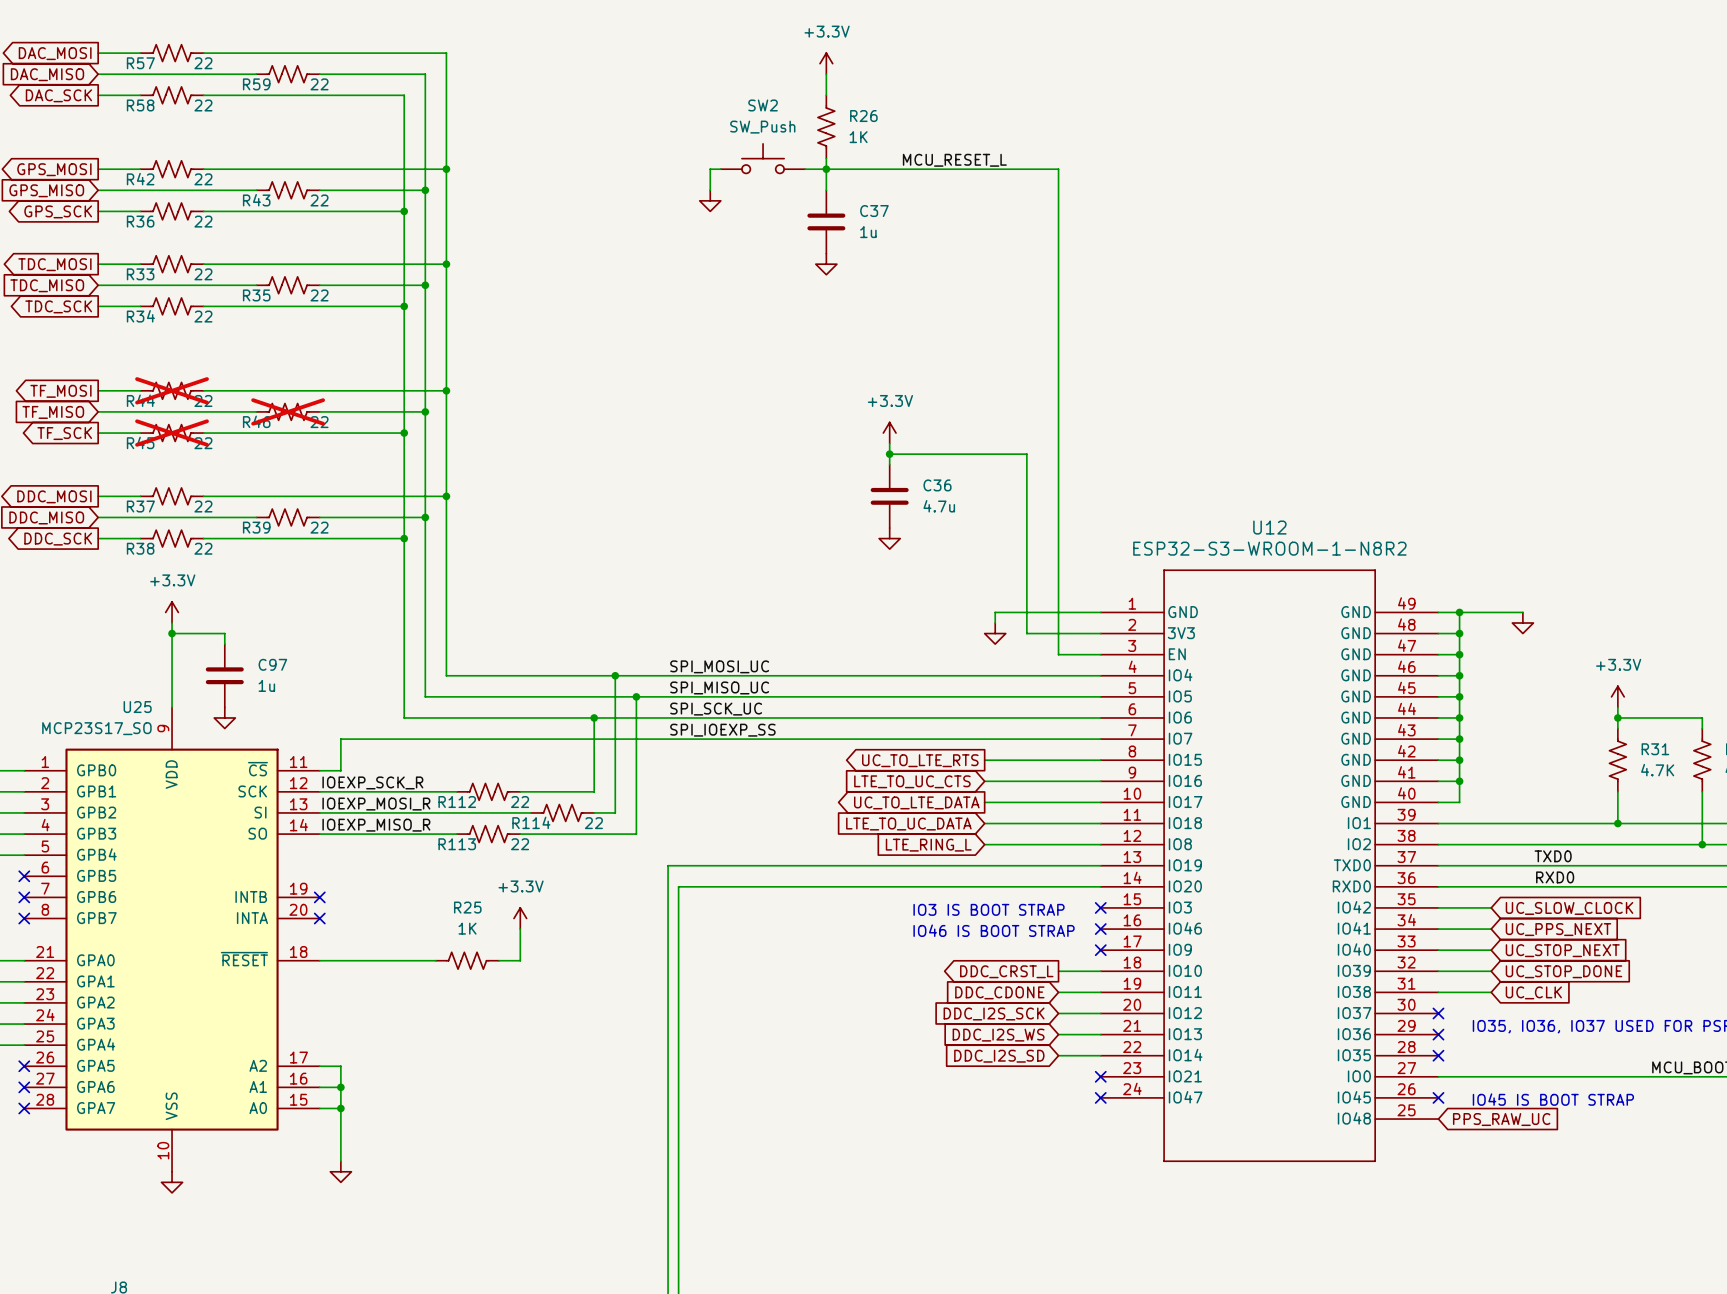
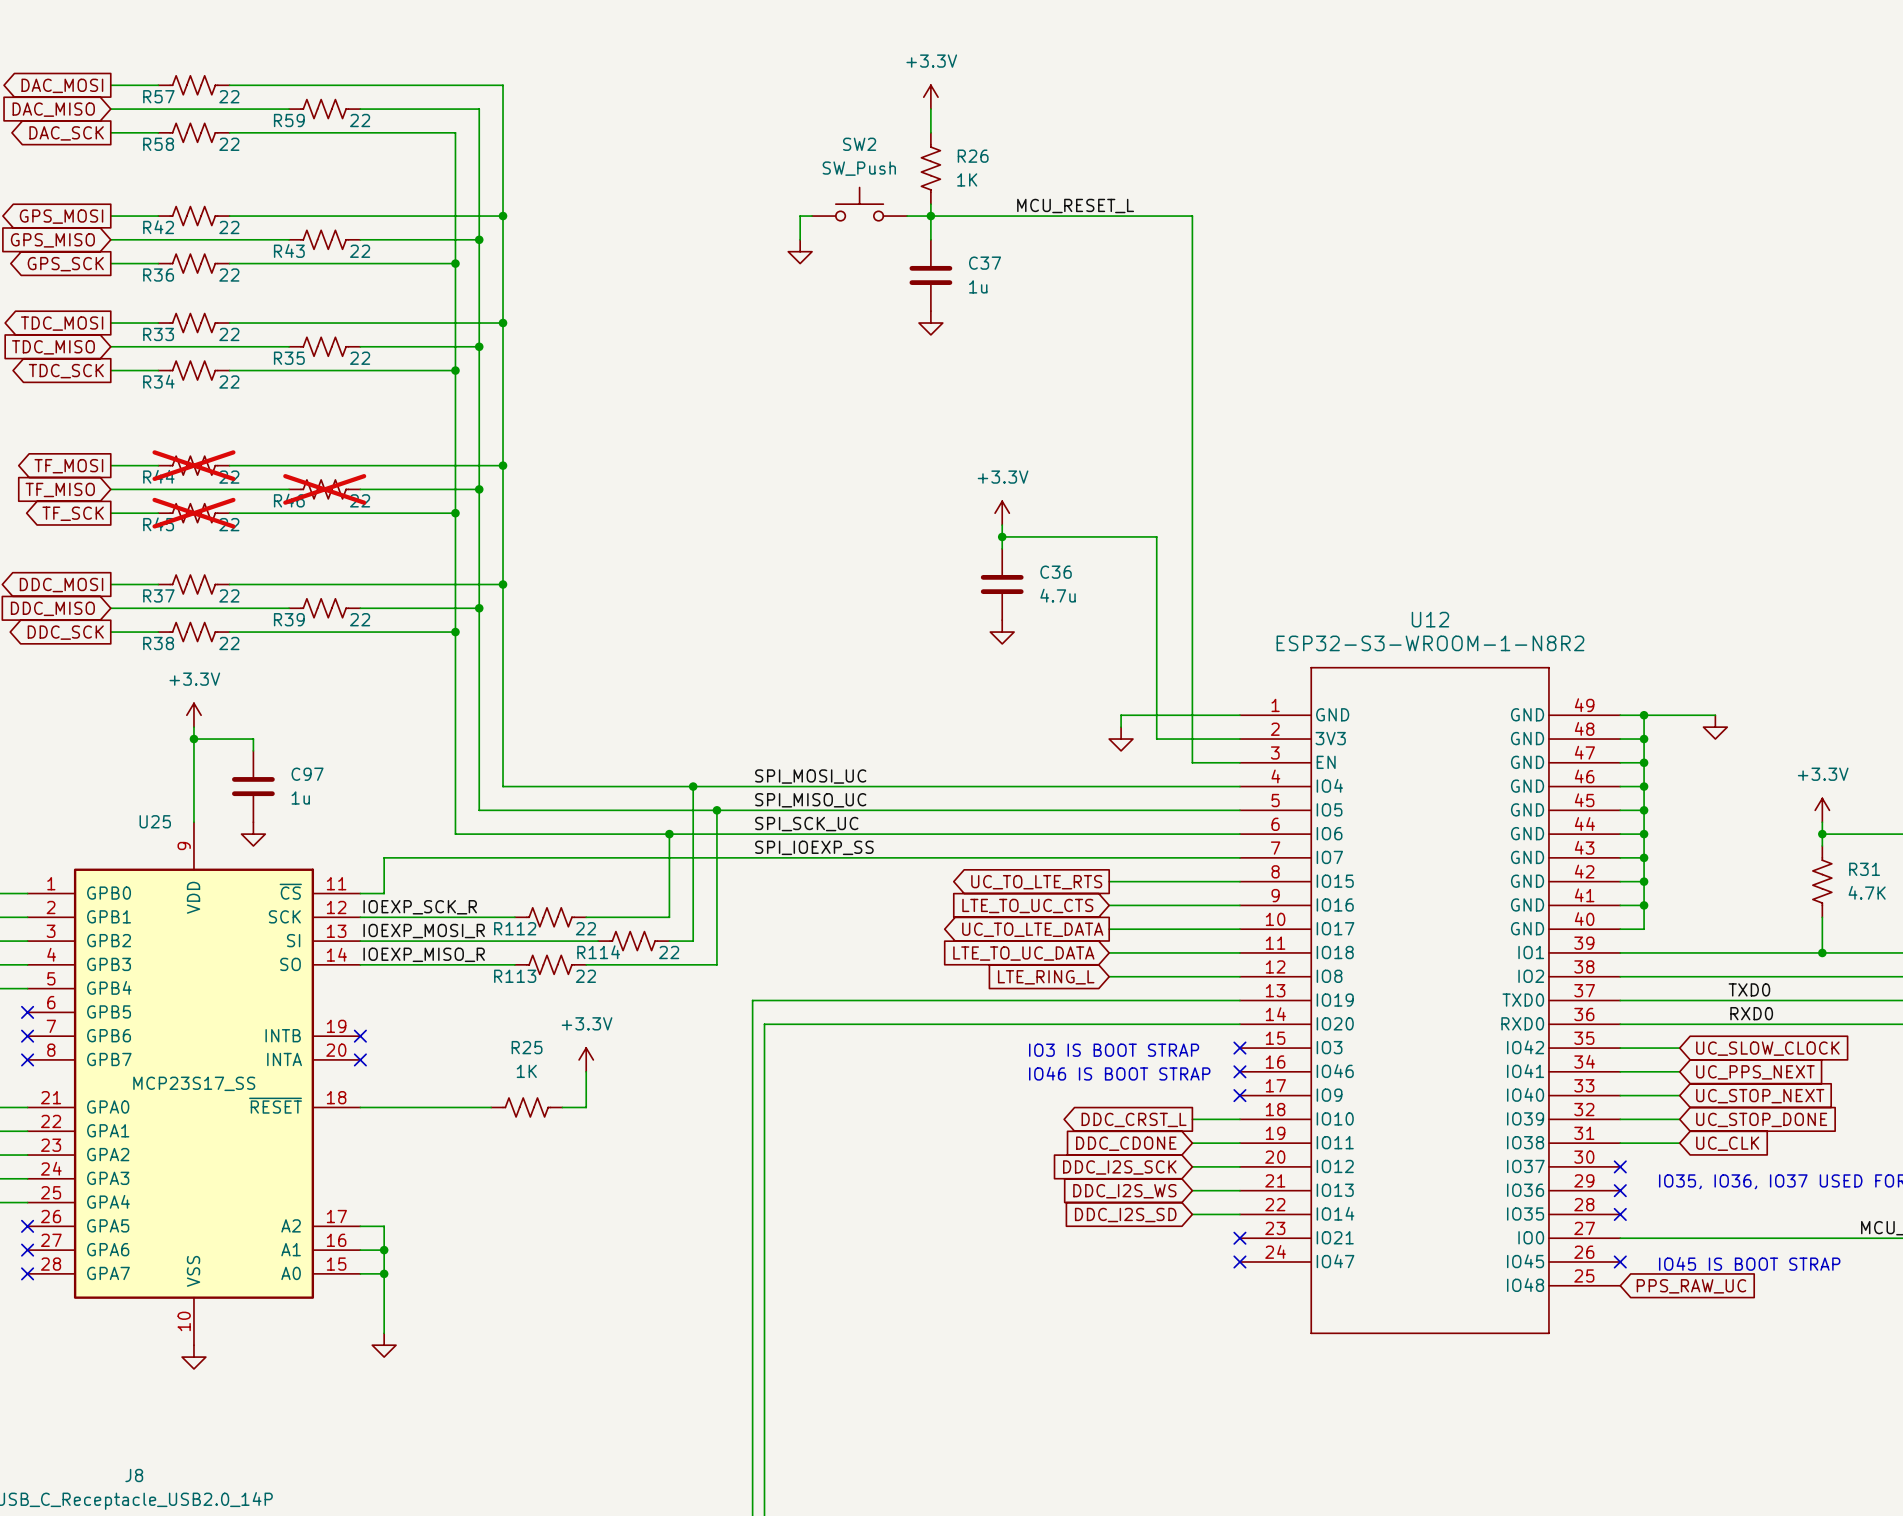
U25 value: MCP23S17_SO (96, 728) -> MCP23S17_SS (194, 1083)

